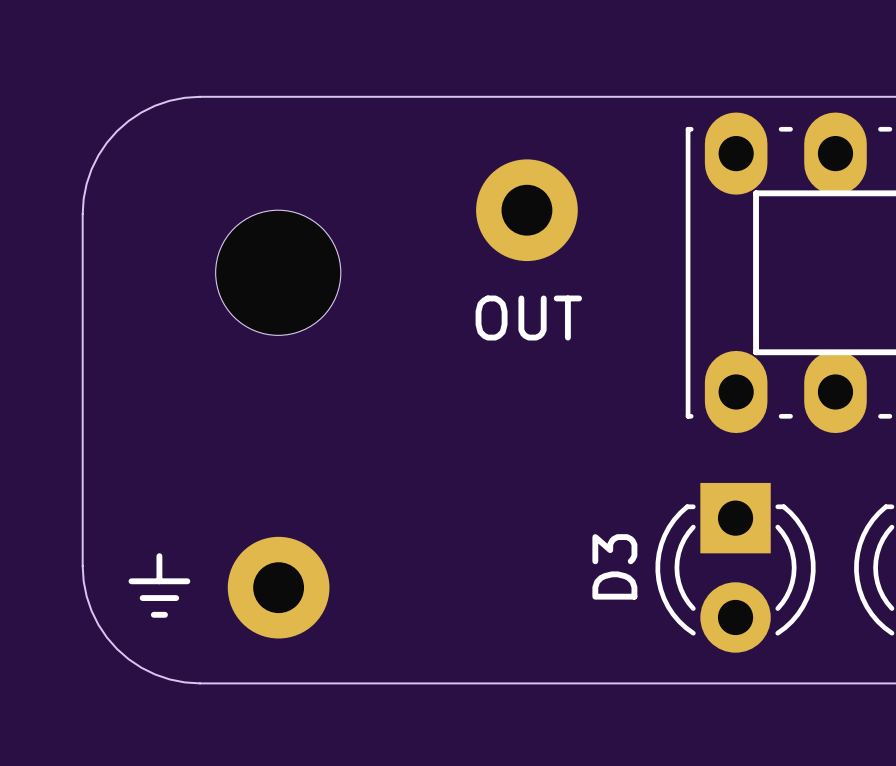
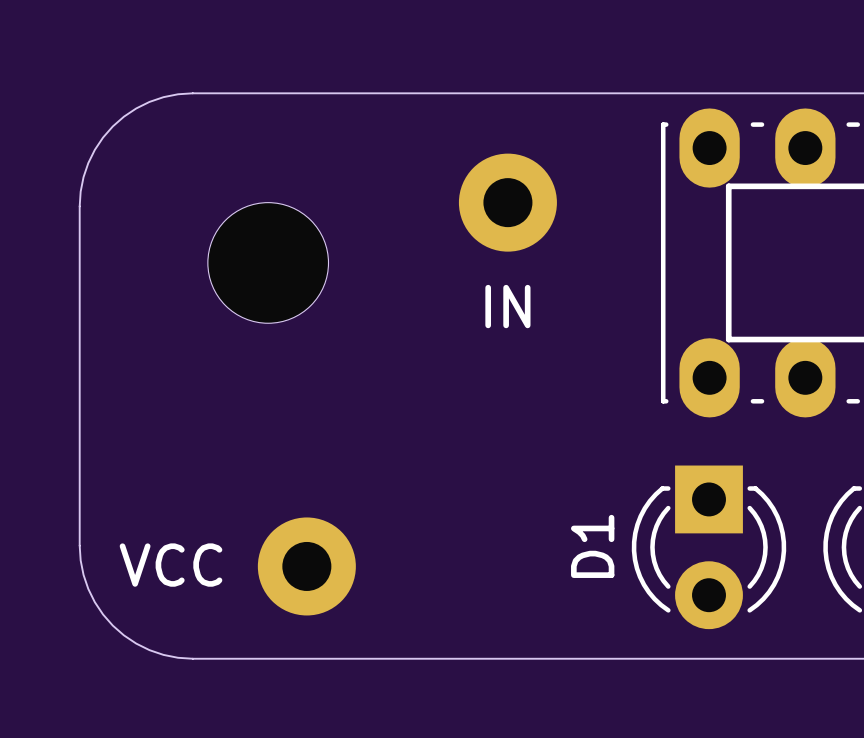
text: OUT (528, 318) -> IN (507, 306)
D3 name: D3 (614, 566) -> D1 (592, 546)
text: ⏚ (159, 585) -> VCC (171, 565)
part position: (278, 587) -> (306, 566)

